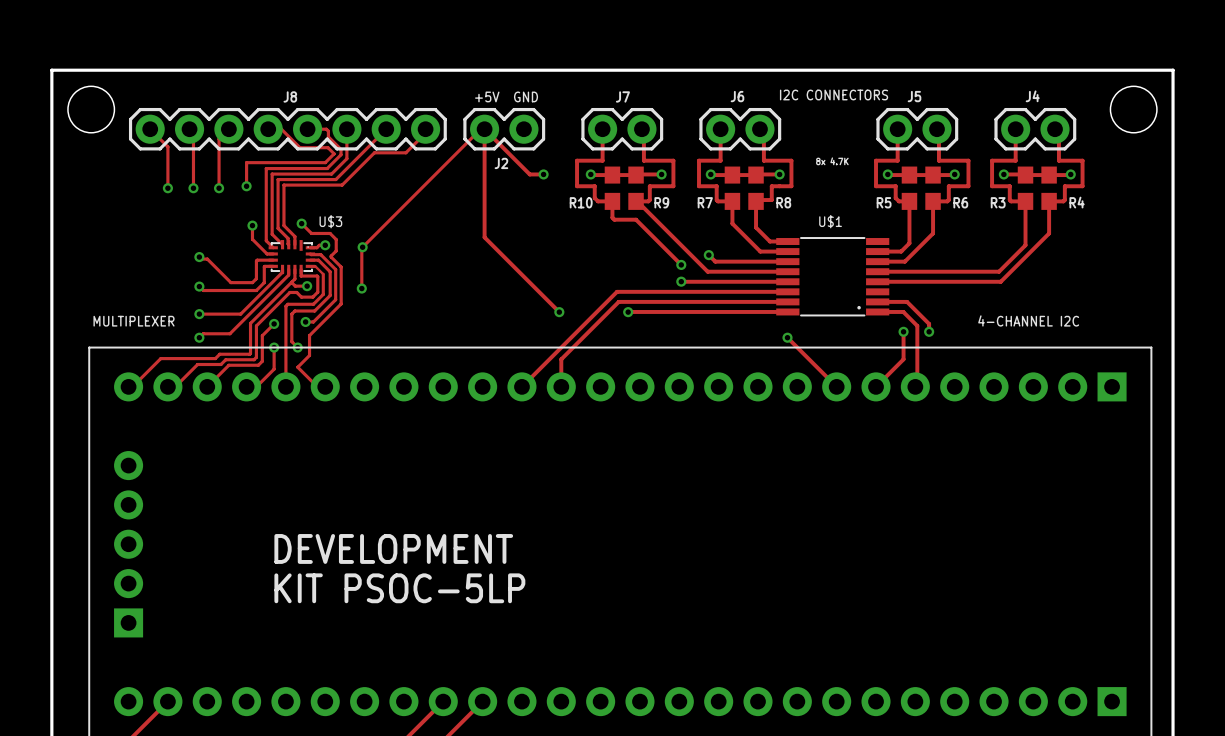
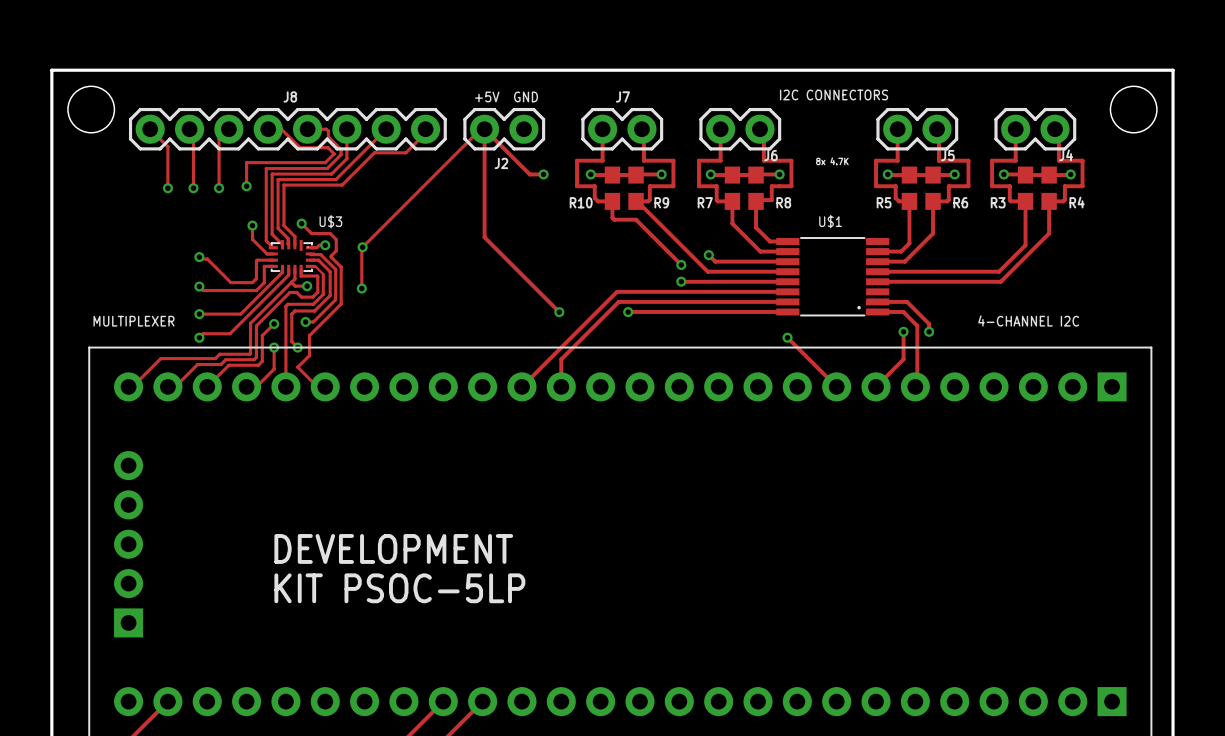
J6 name position: J6 (737, 96) -> J6 (770, 155)
J5 name position: J5 (914, 96) -> J5 (947, 155)
J4 name position: J4 (1032, 96) -> J4 (1066, 155)

